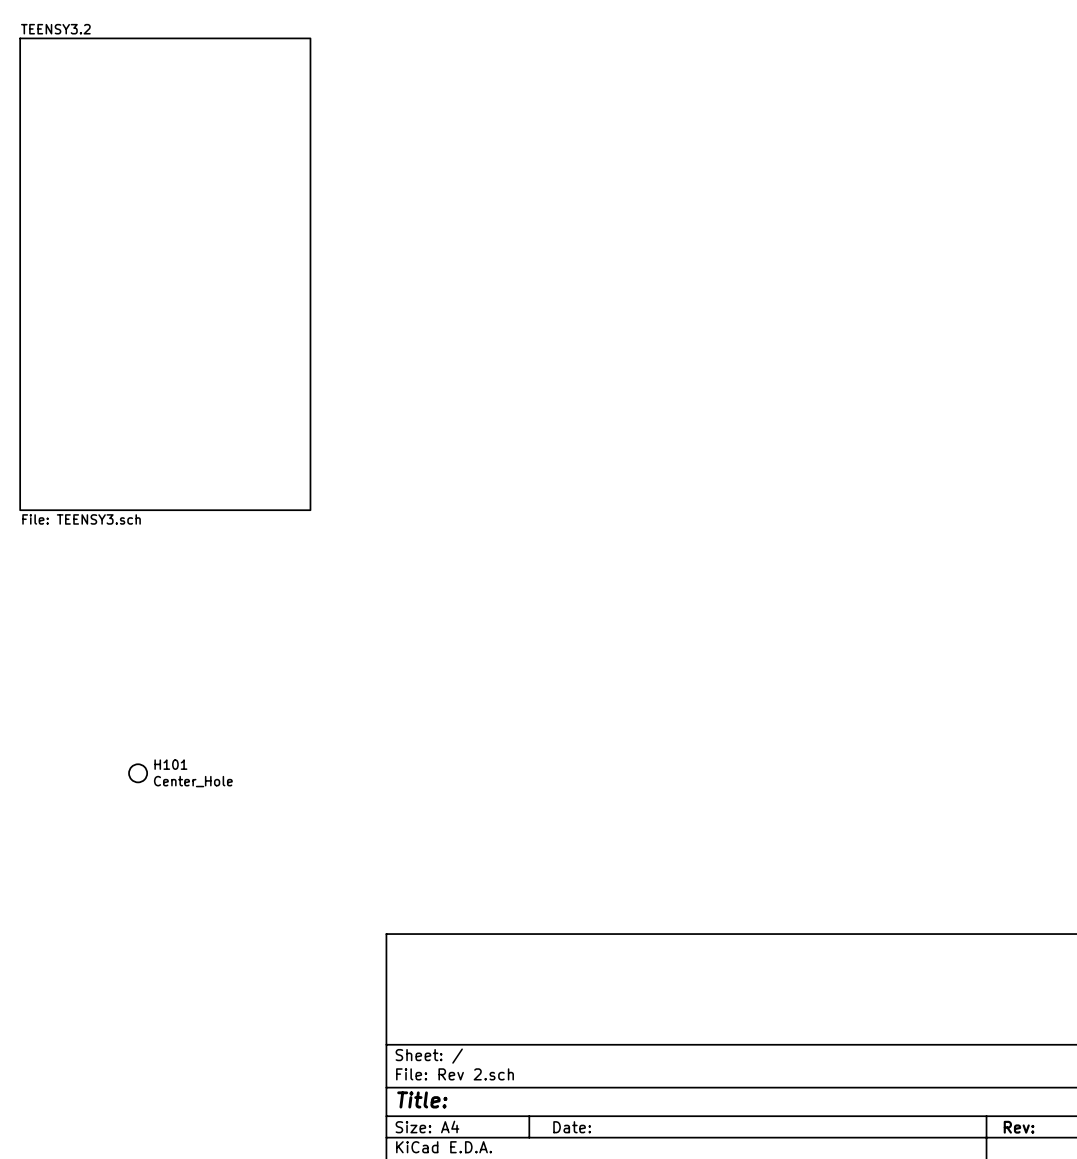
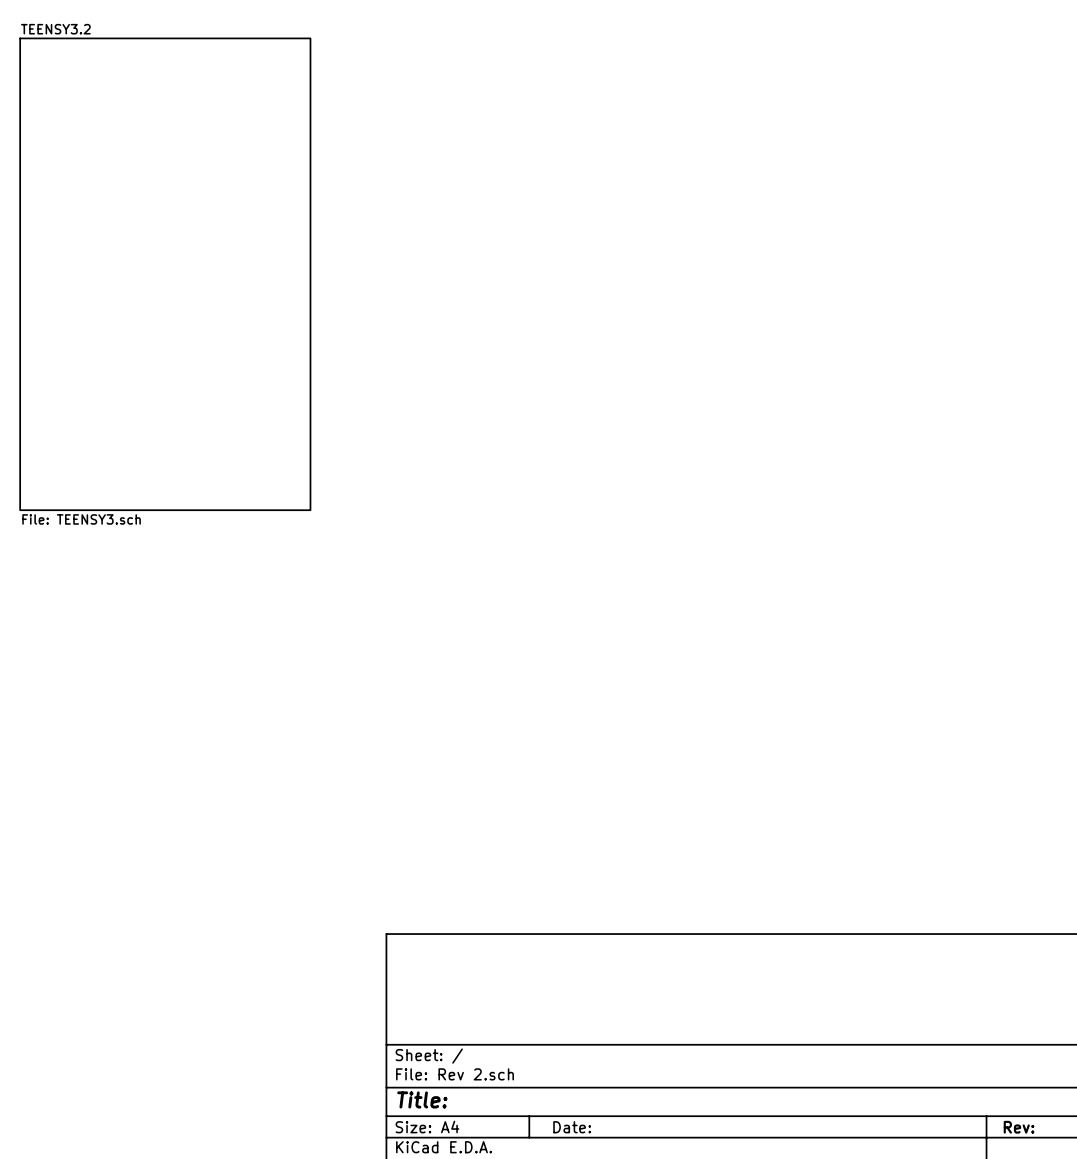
H101: Center_Hole (138, 773) -> none

